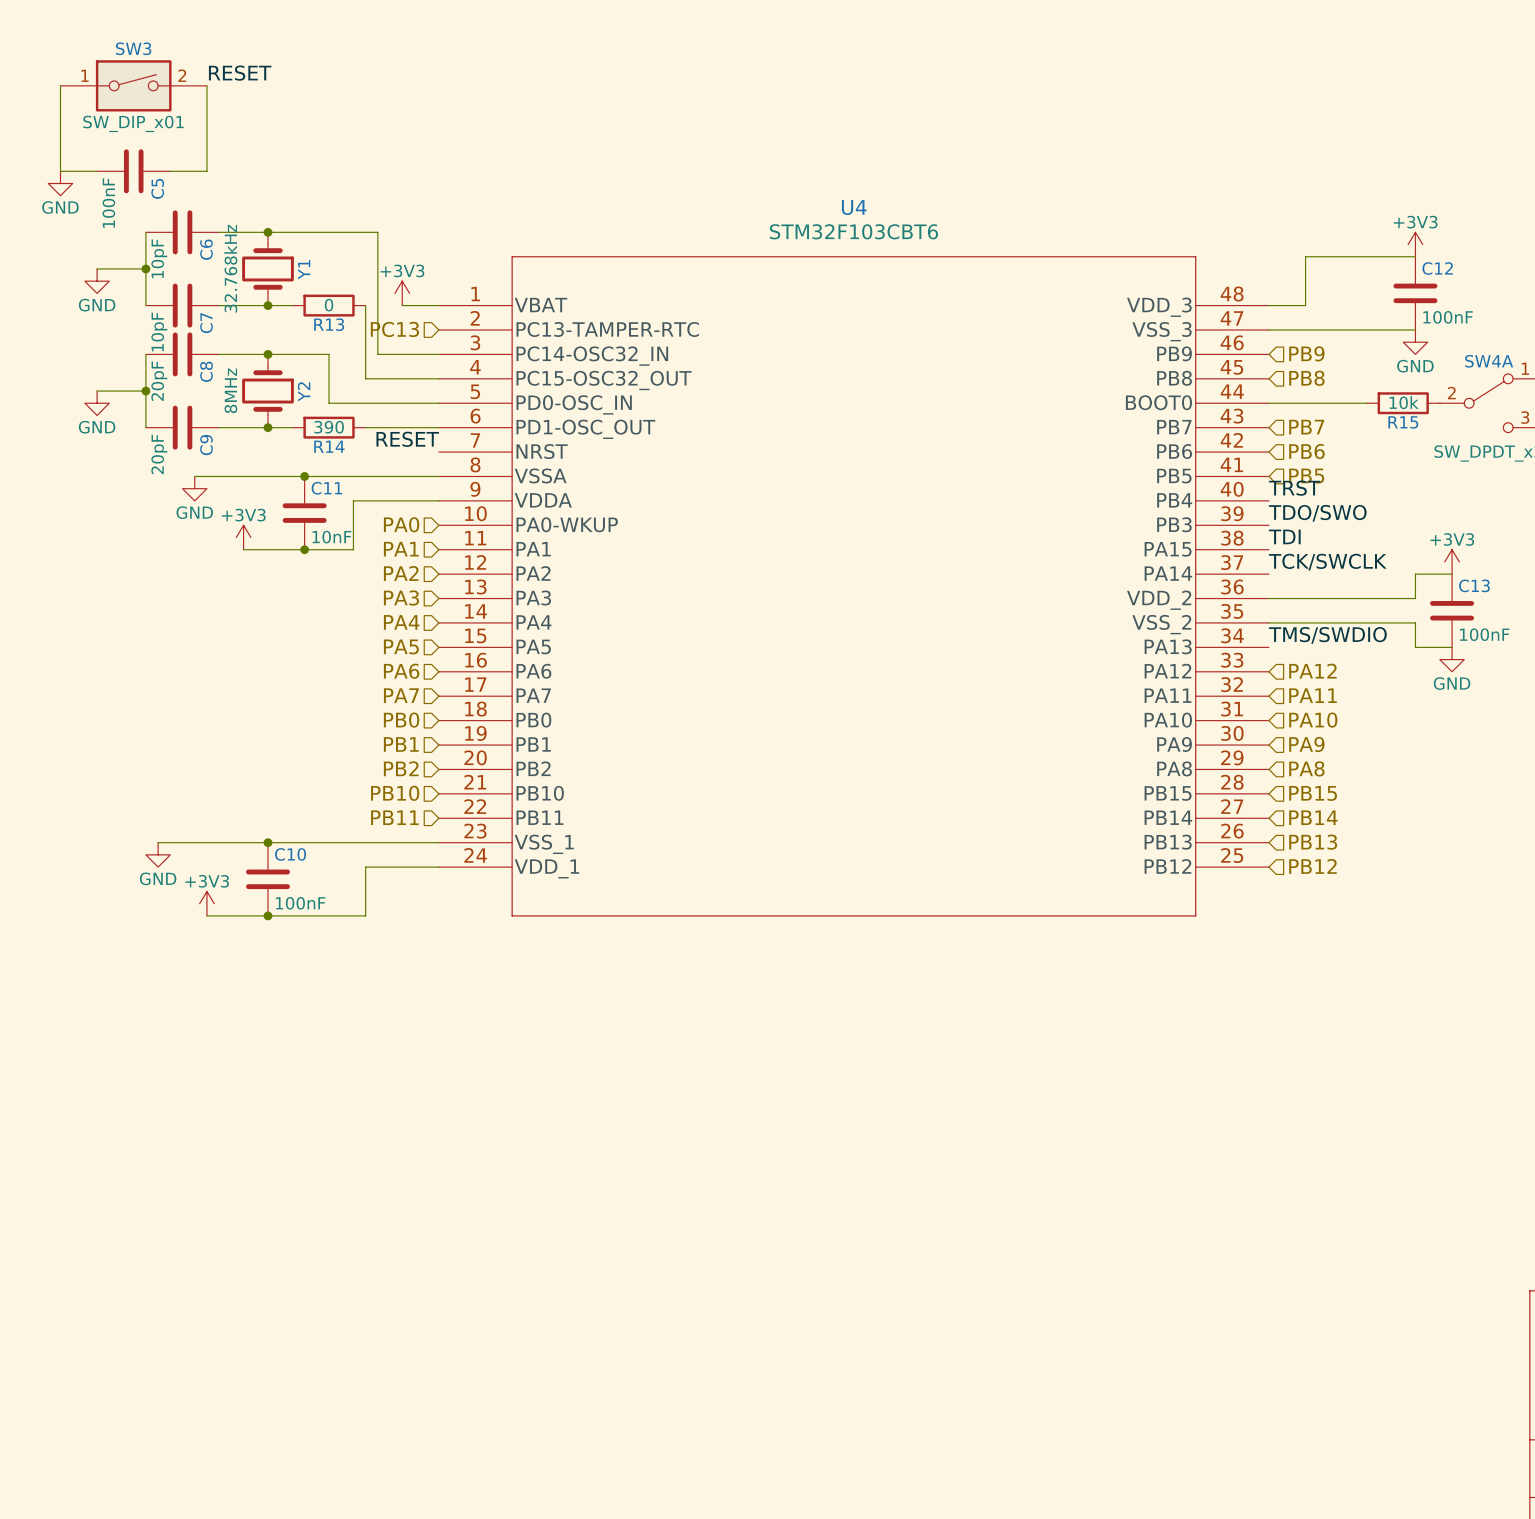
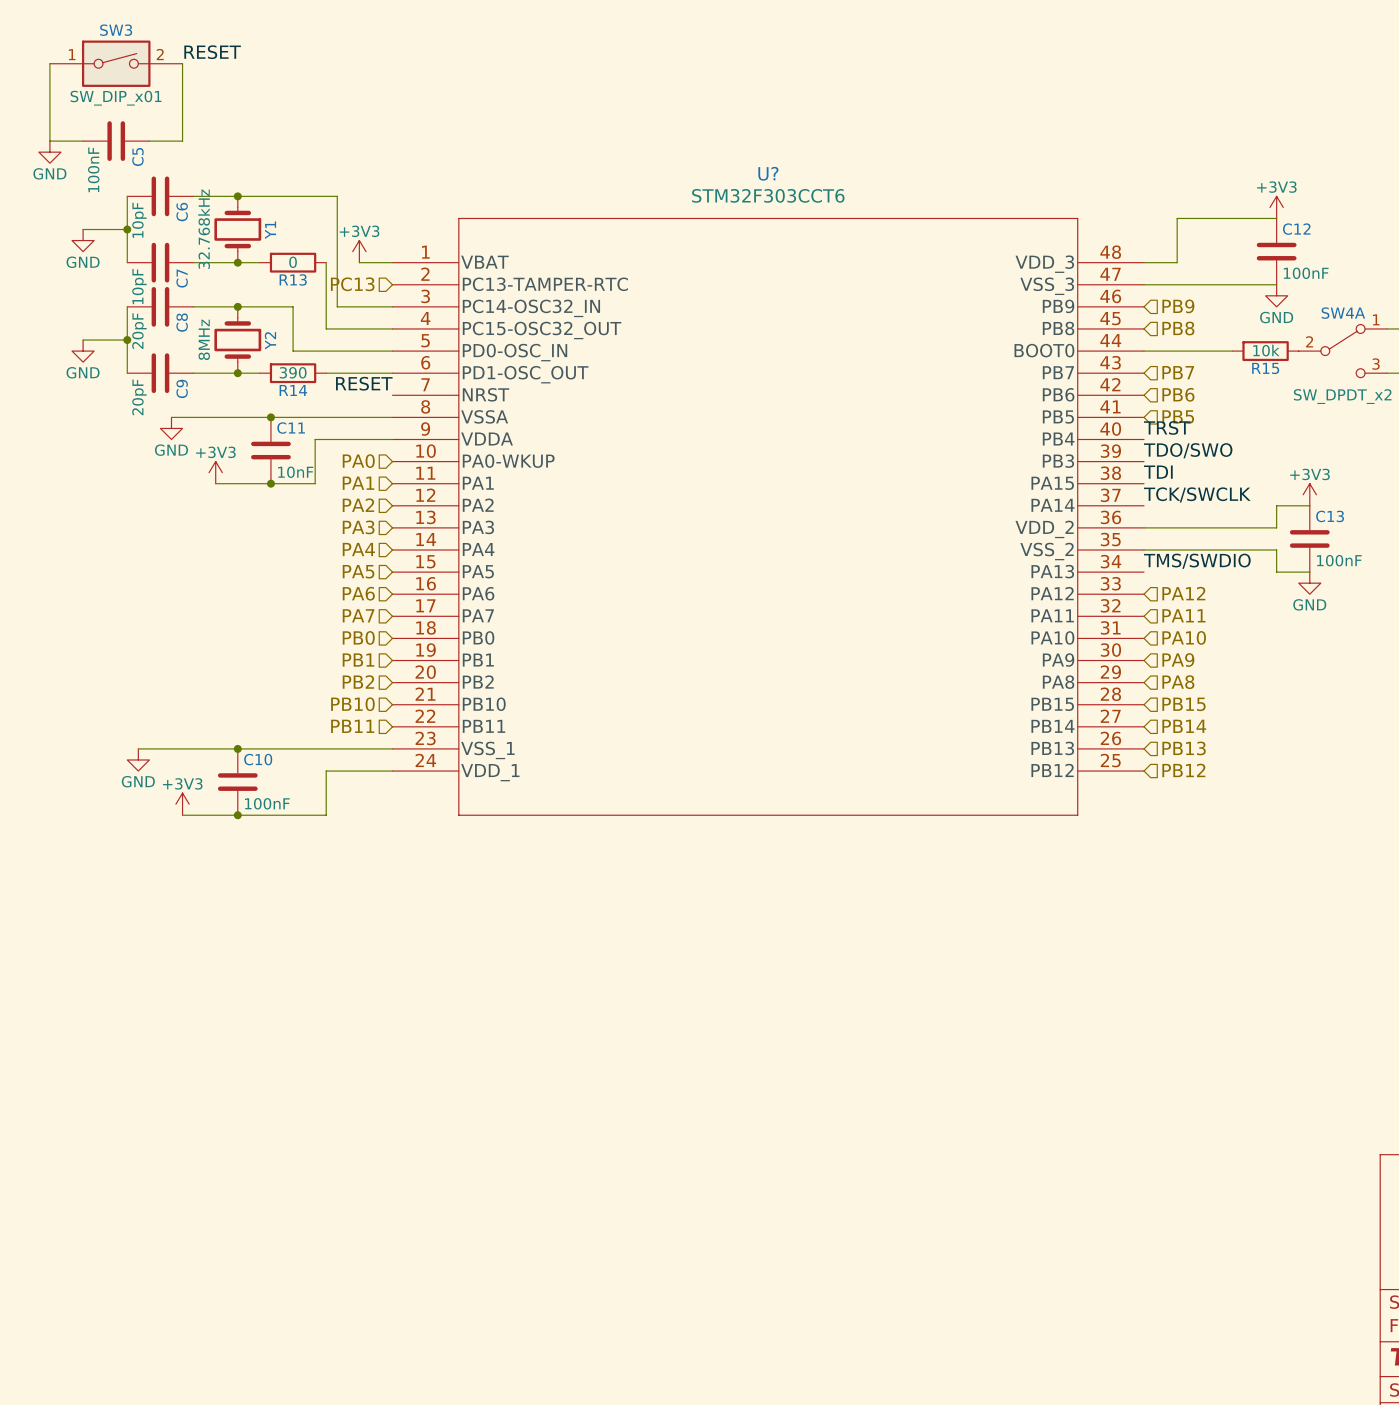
U4 name: U4 (854, 207) -> U? (768, 173)
U4 value: STM32F103CBT6 (853, 231) -> STM32F303CCT6 (768, 195)

